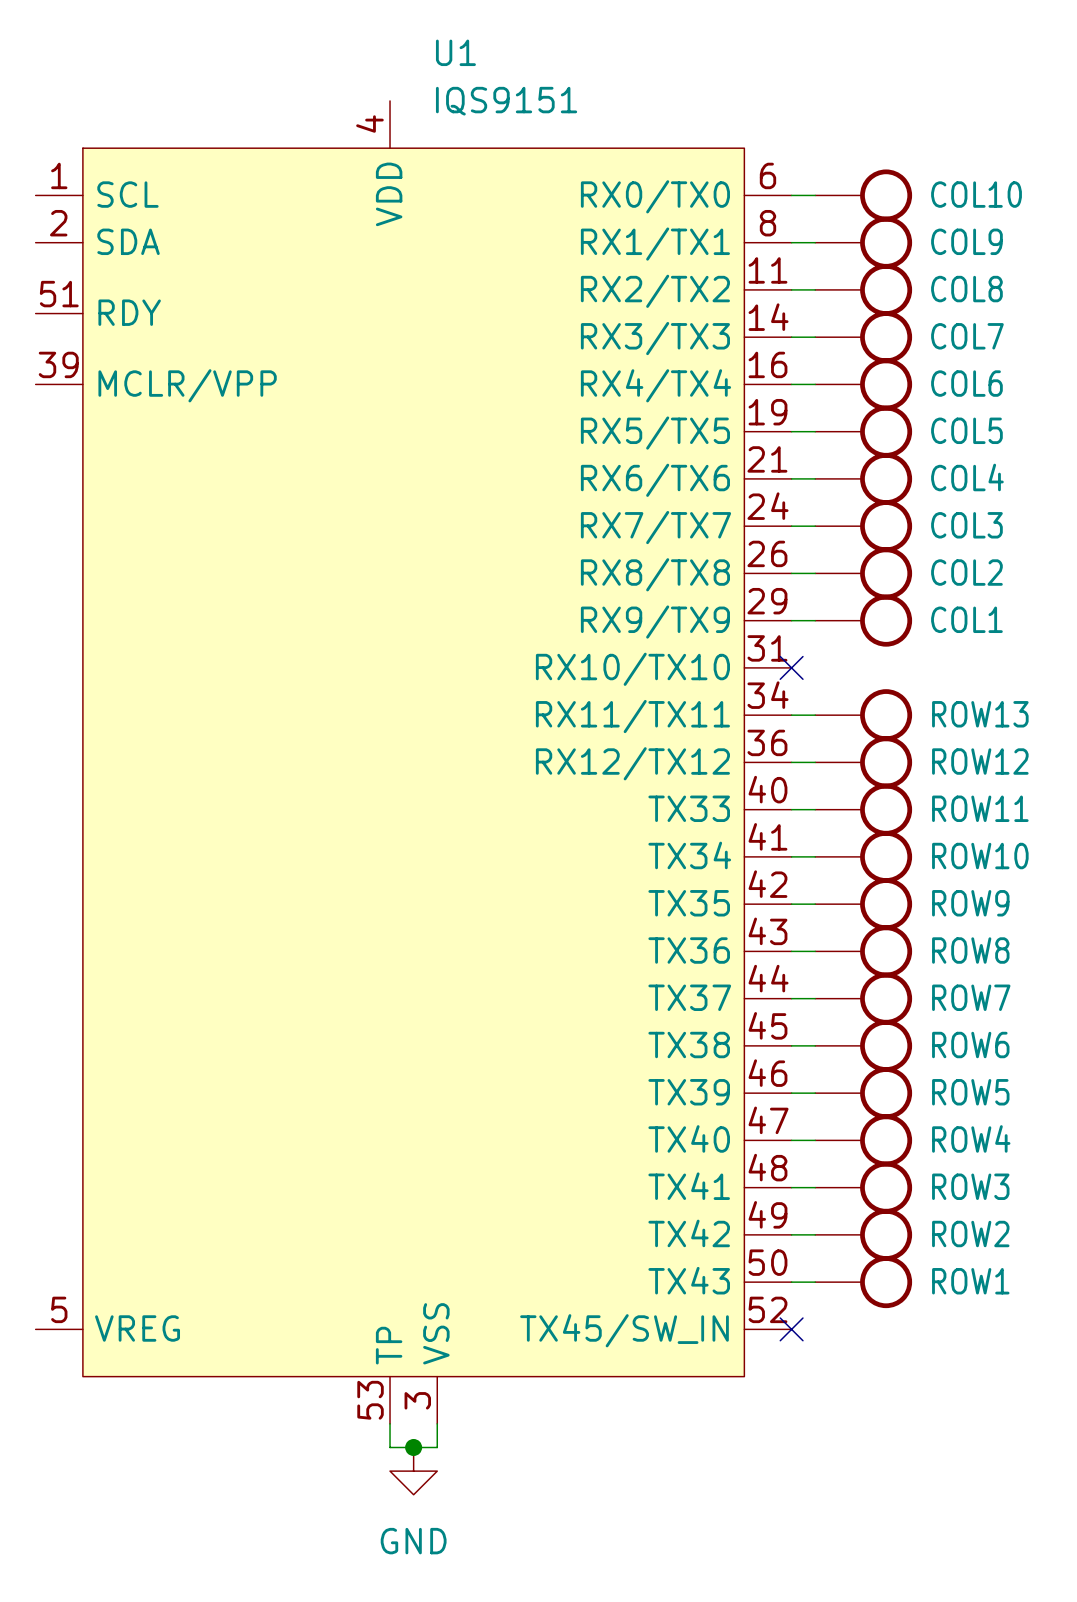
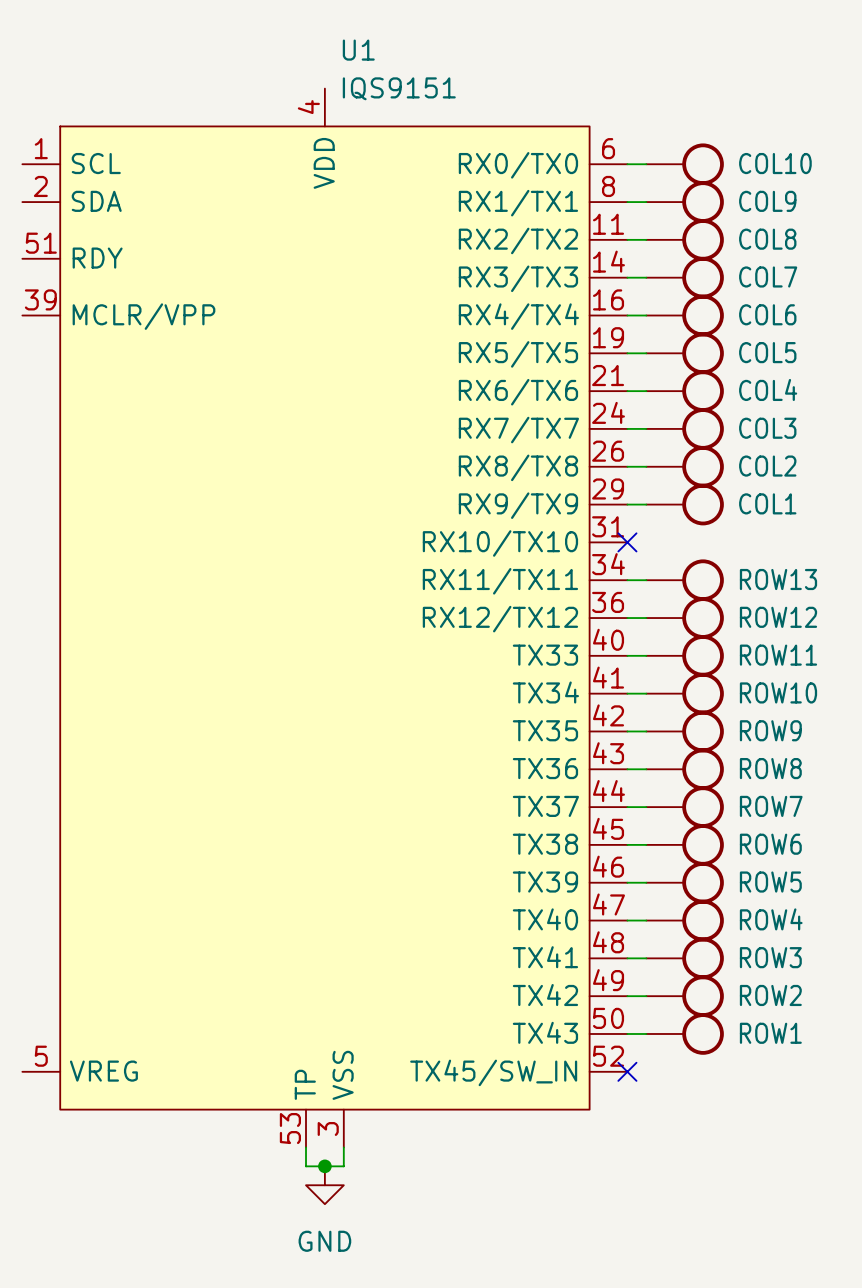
U1 symbol: [35, 100, 792, 1424] -> [22, 88, 628, 1148]

